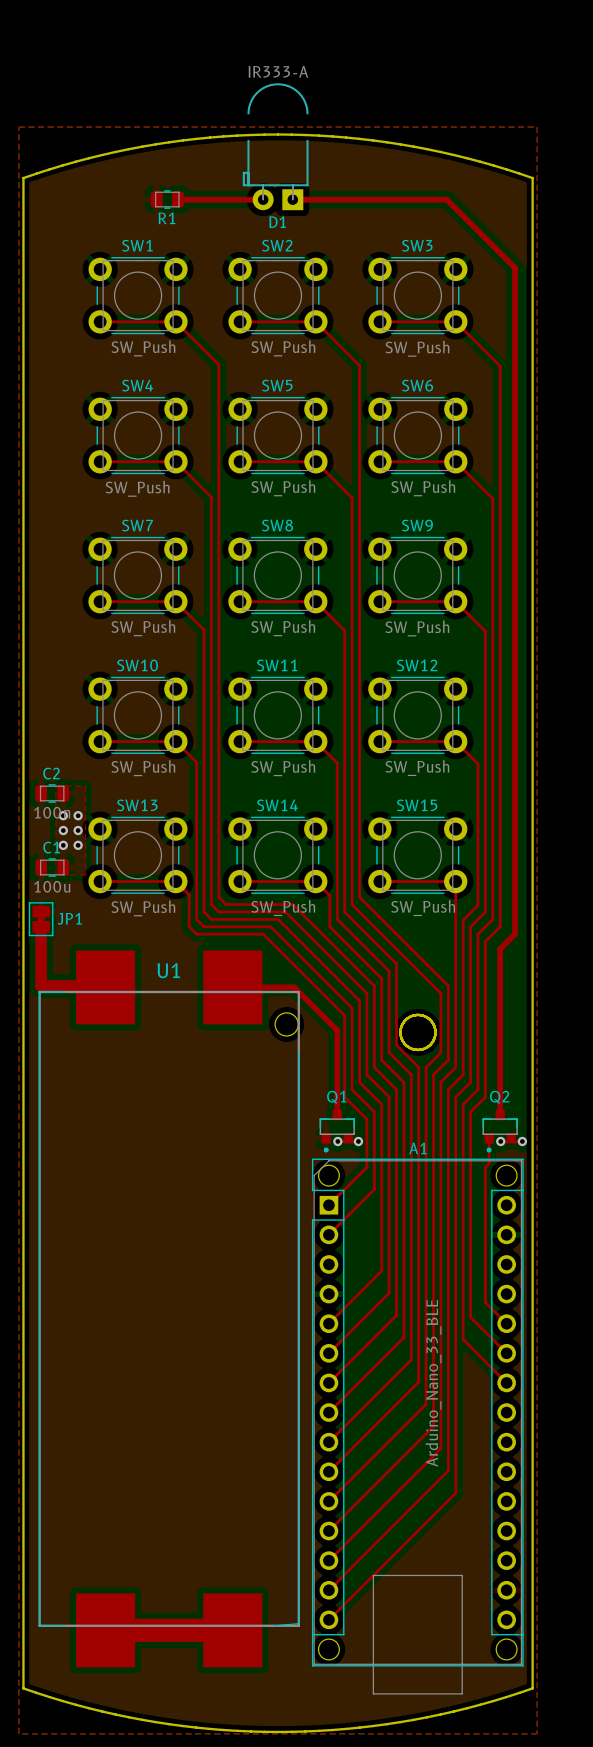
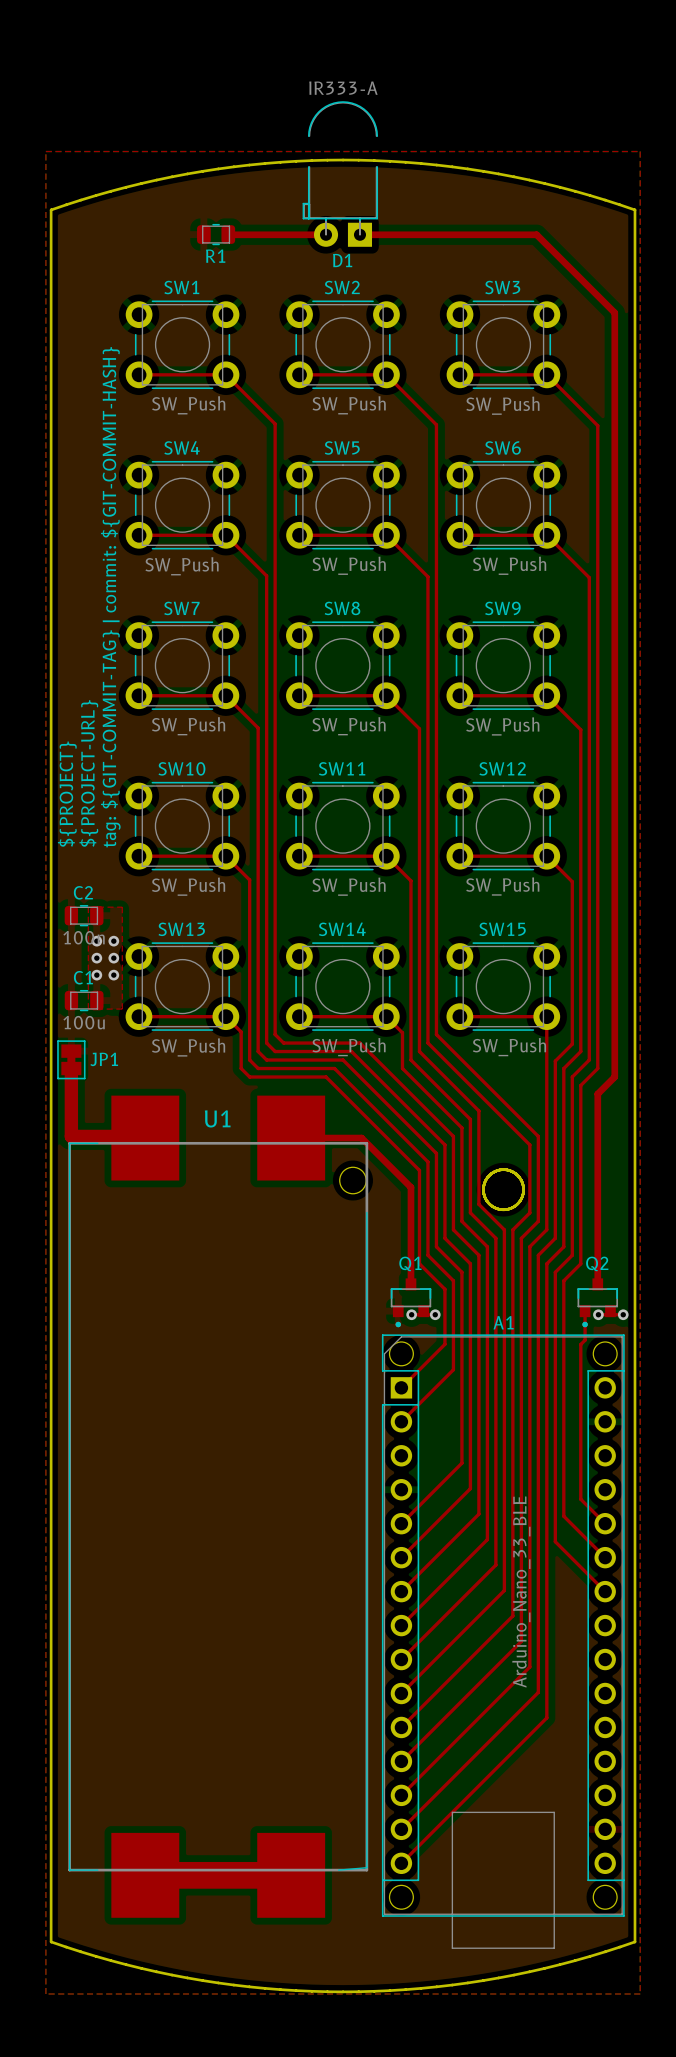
text: none -> tag: ${GIT-COMMIT-TAG} | commit: ${GIT-COMMIT-HASH} (110, 597)
text: none -> ${PROJECT-URL} (88, 773)
text: none -> ${PROJECT} (67, 794)

